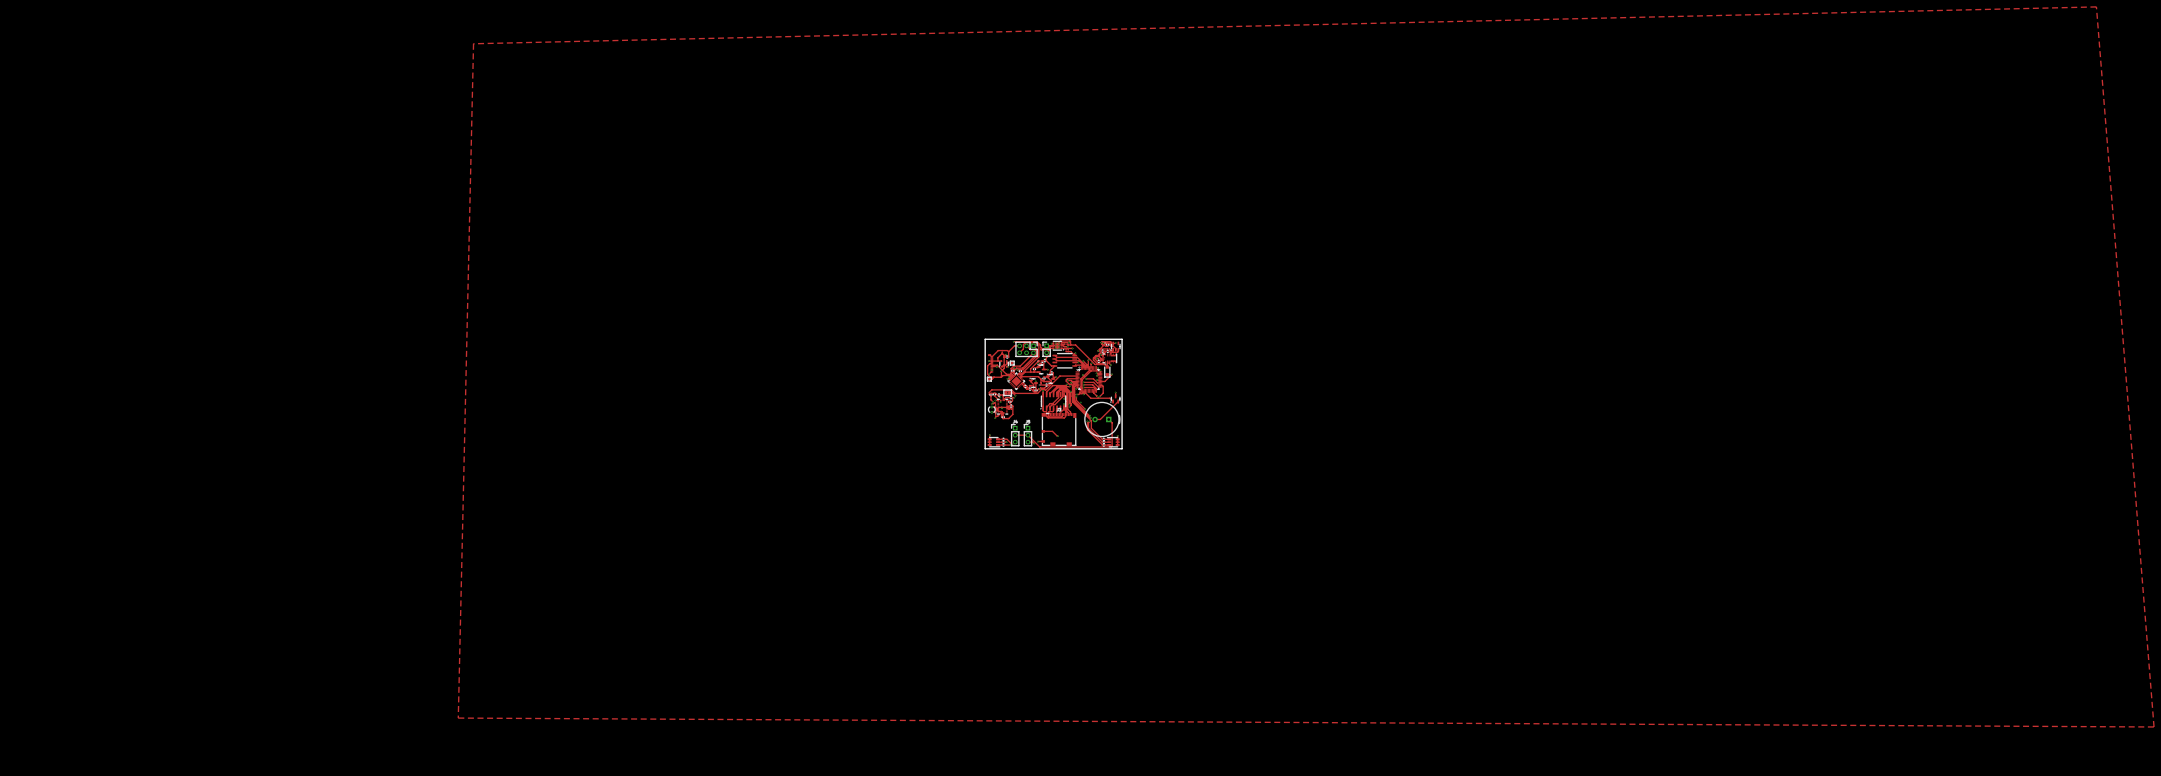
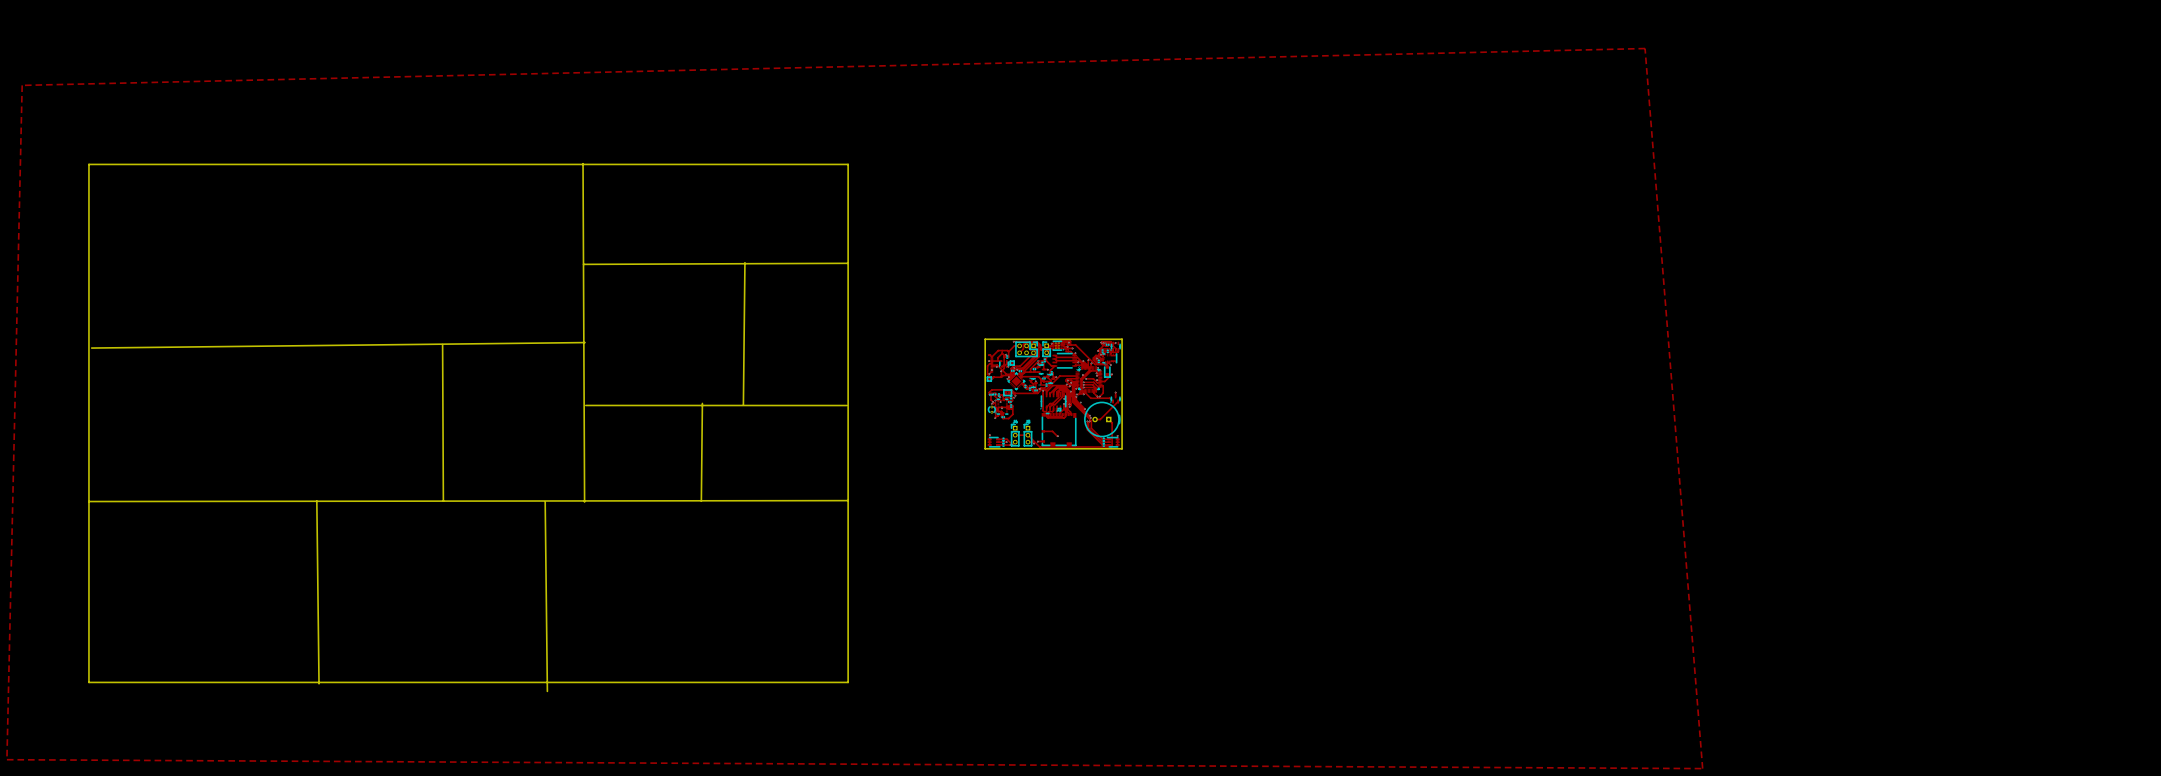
zone outline: (2096, 6) (2154, 726) (458, 718) (473, 43) (2096, 6) -> (1645, 48) (1702, 768) (6, 759) (22, 85) (1645, 48)
board edge: none -> (583, 163) (584, 502)
board edge: none -> (88, 164) (848, 164) (848, 682) (88, 682) (88, 164)
board edge: none -> (744, 262) (743, 404)
board edge: none -> (847, 263) (583, 264)
board edge: none -> (585, 342) (91, 348)
board edge: none -> (442, 344) (443, 500)
board edge: none -> (702, 403) (701, 501)
board edge: none -> (585, 405) (846, 405)
board edge: none -> (848, 500) (88, 501)
board edge: none -> (316, 501) (319, 683)
board edge: none -> (545, 502) (547, 691)

